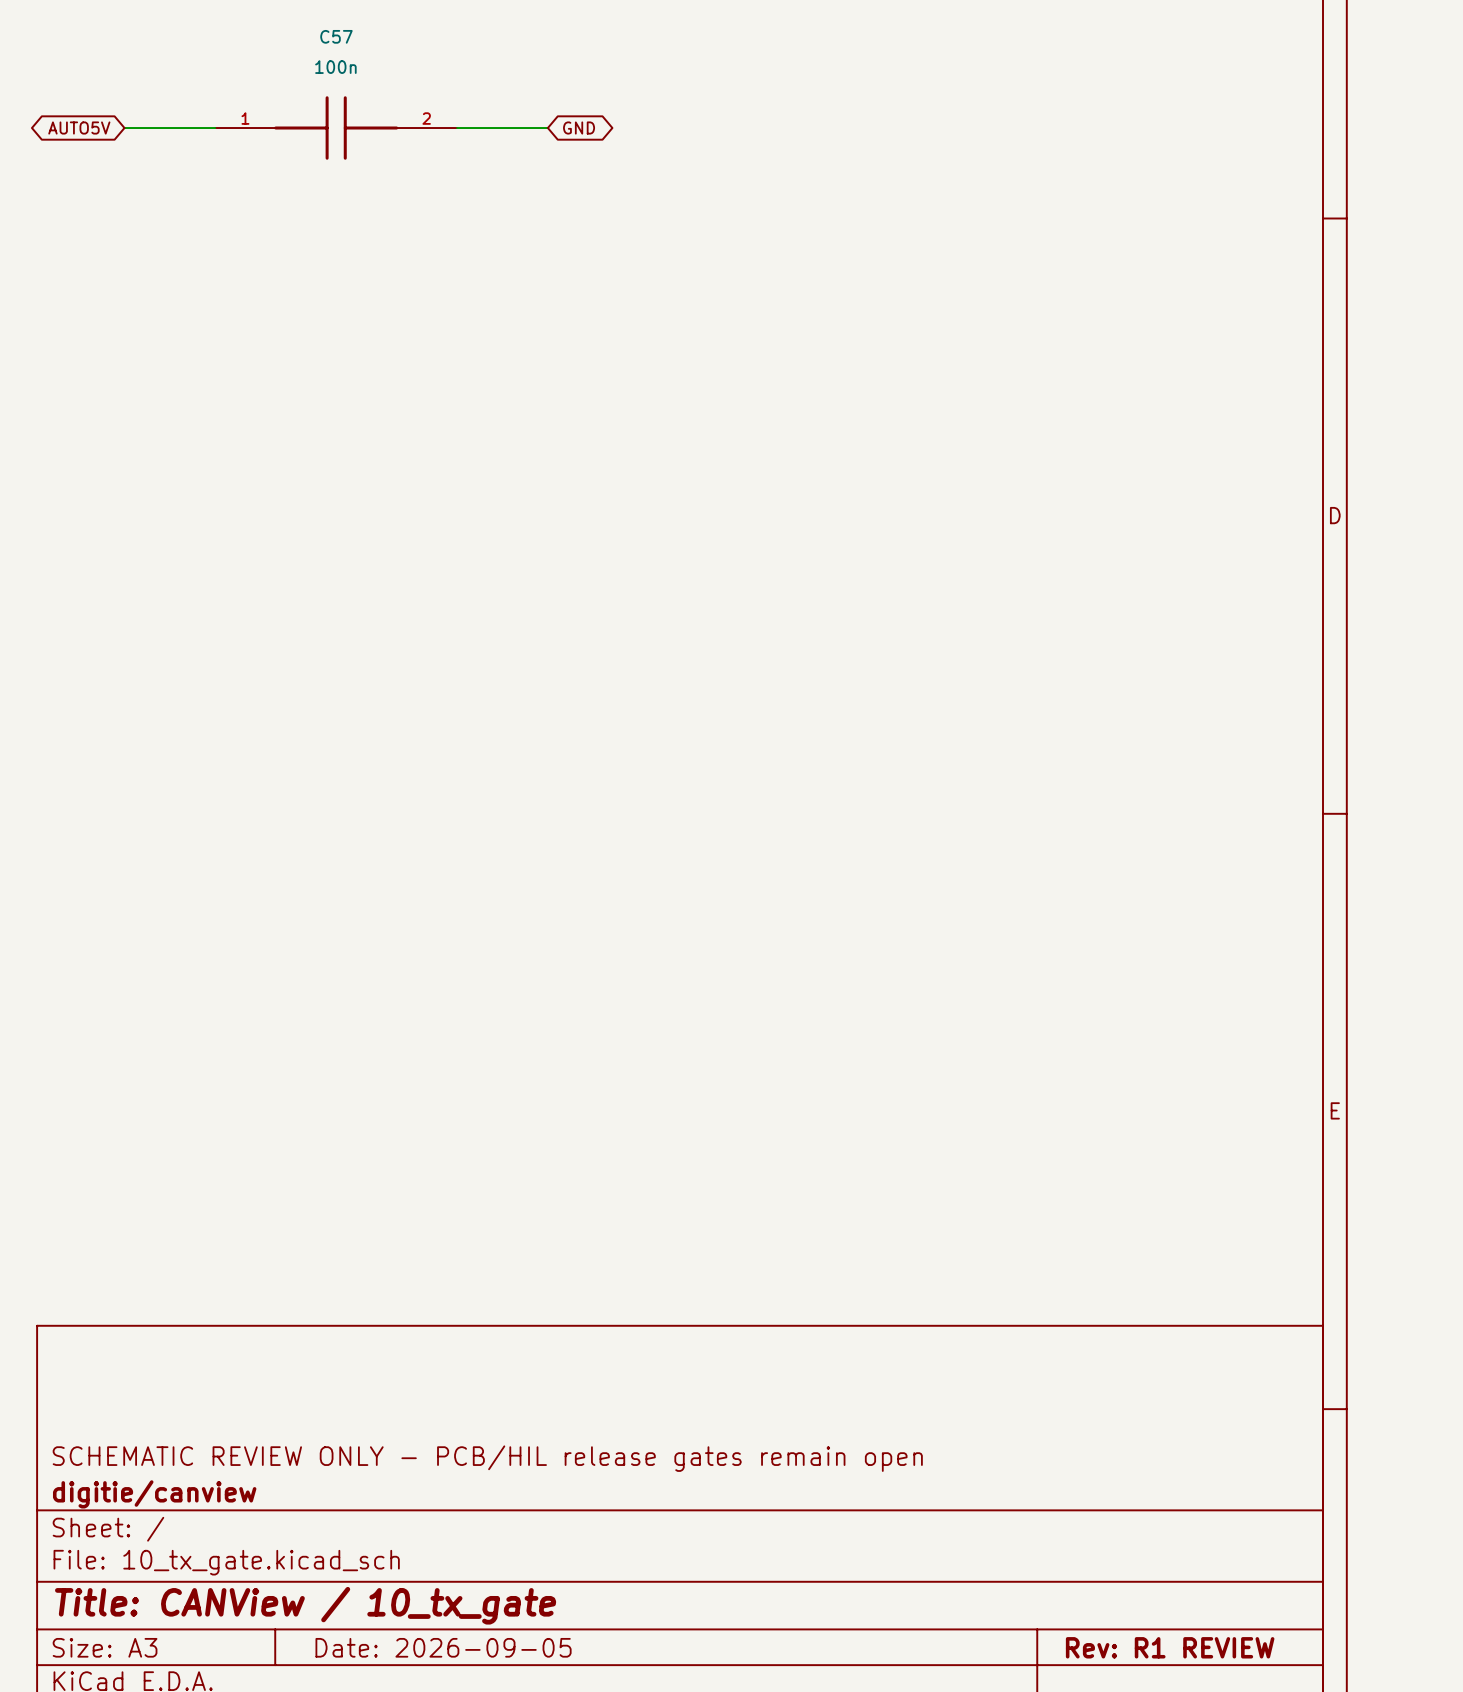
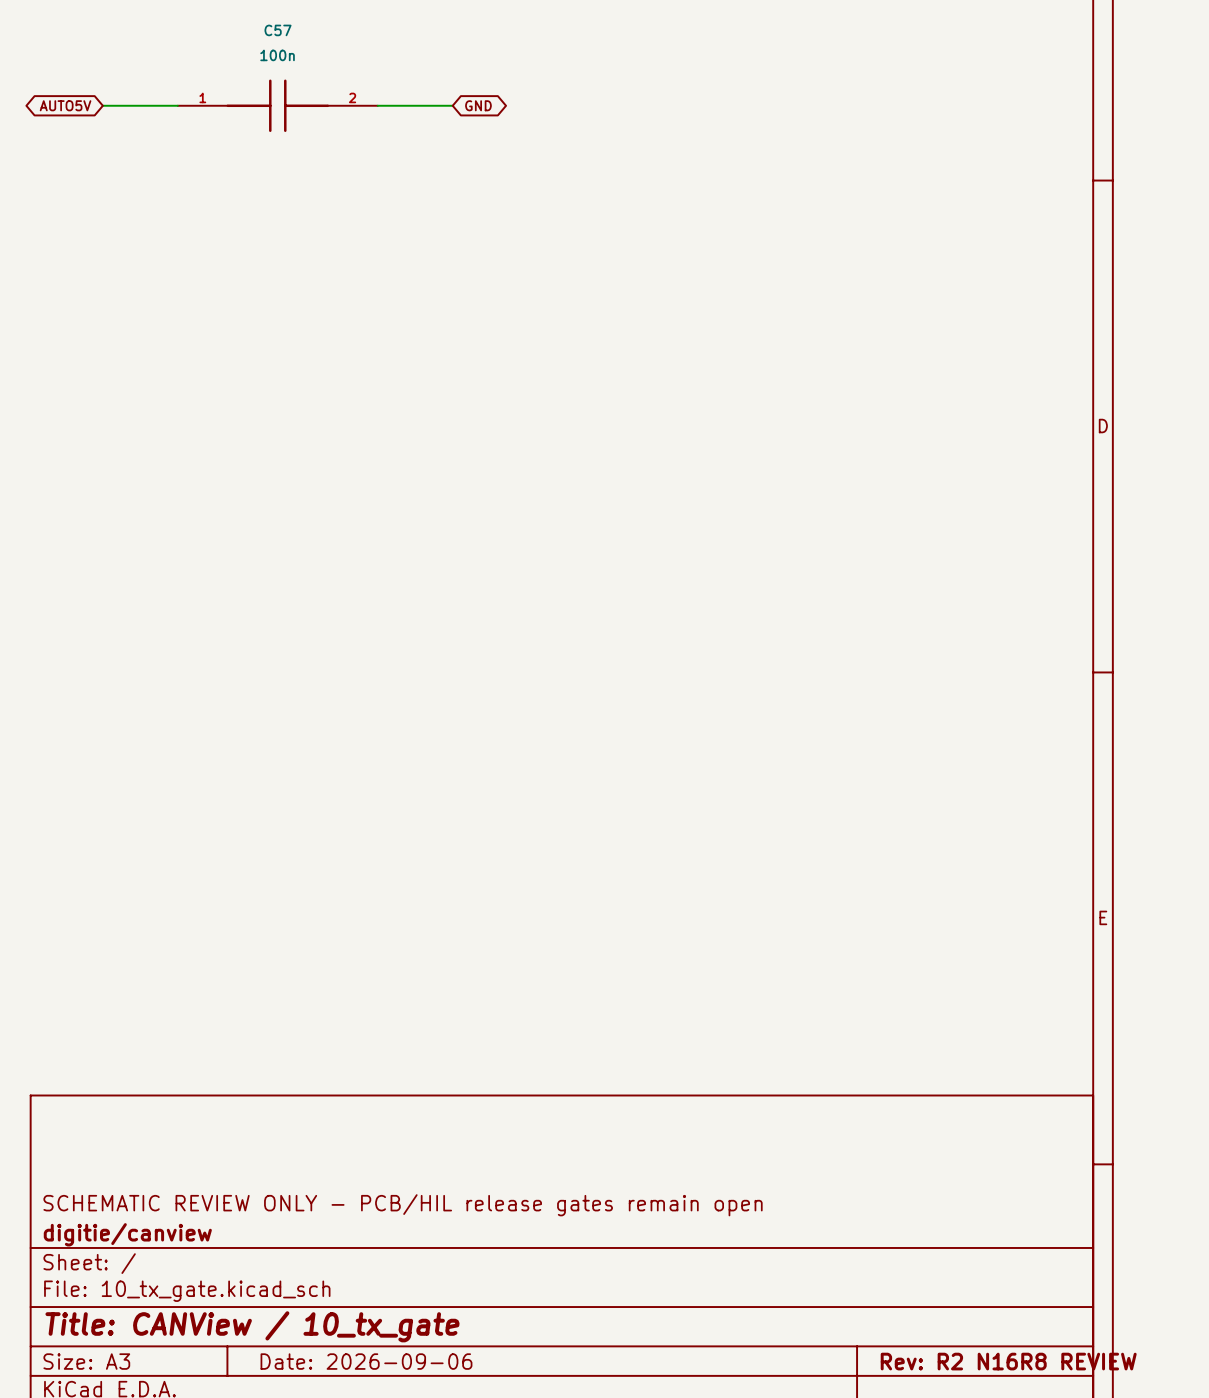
title block: Date: 2026-09-05 (443, 1647) -> Date: 2026-09-06 (366, 1361)
title block: Rev: R1 REVIEW (1170, 1647) -> Rev: R2 N16R8 REVIEW (1008, 1361)

